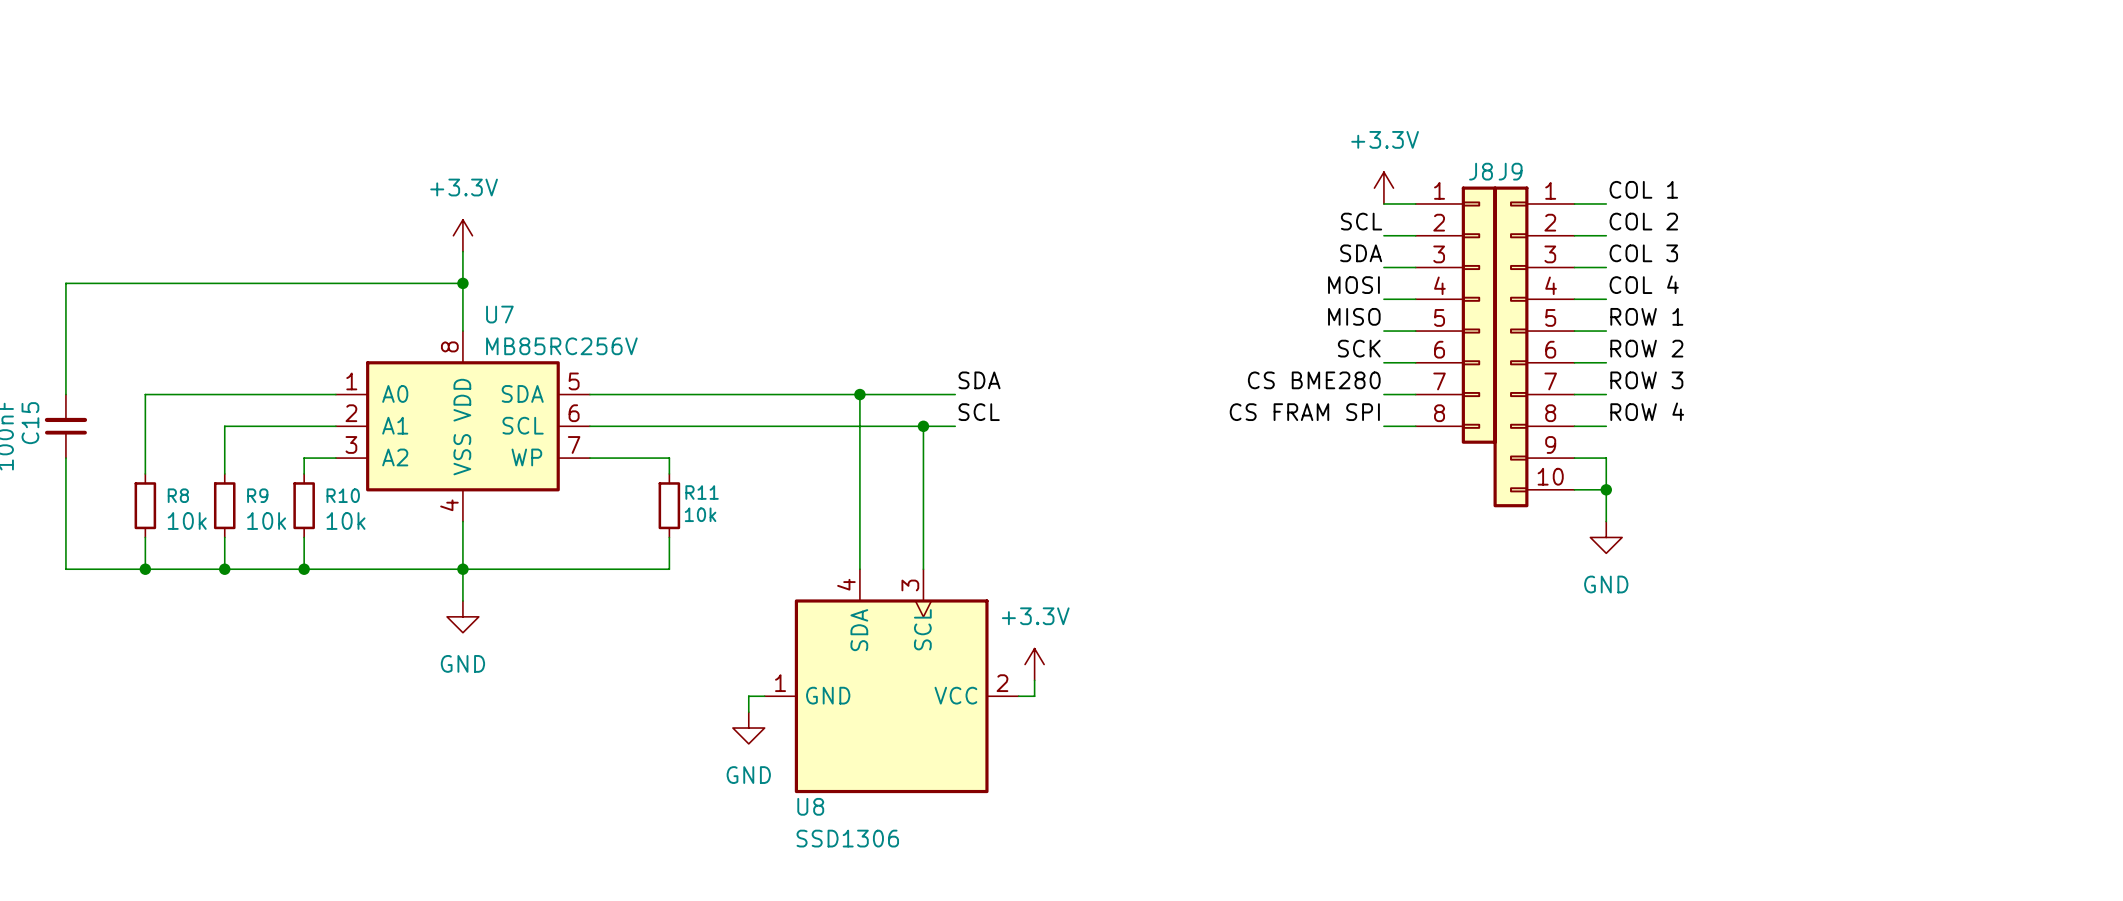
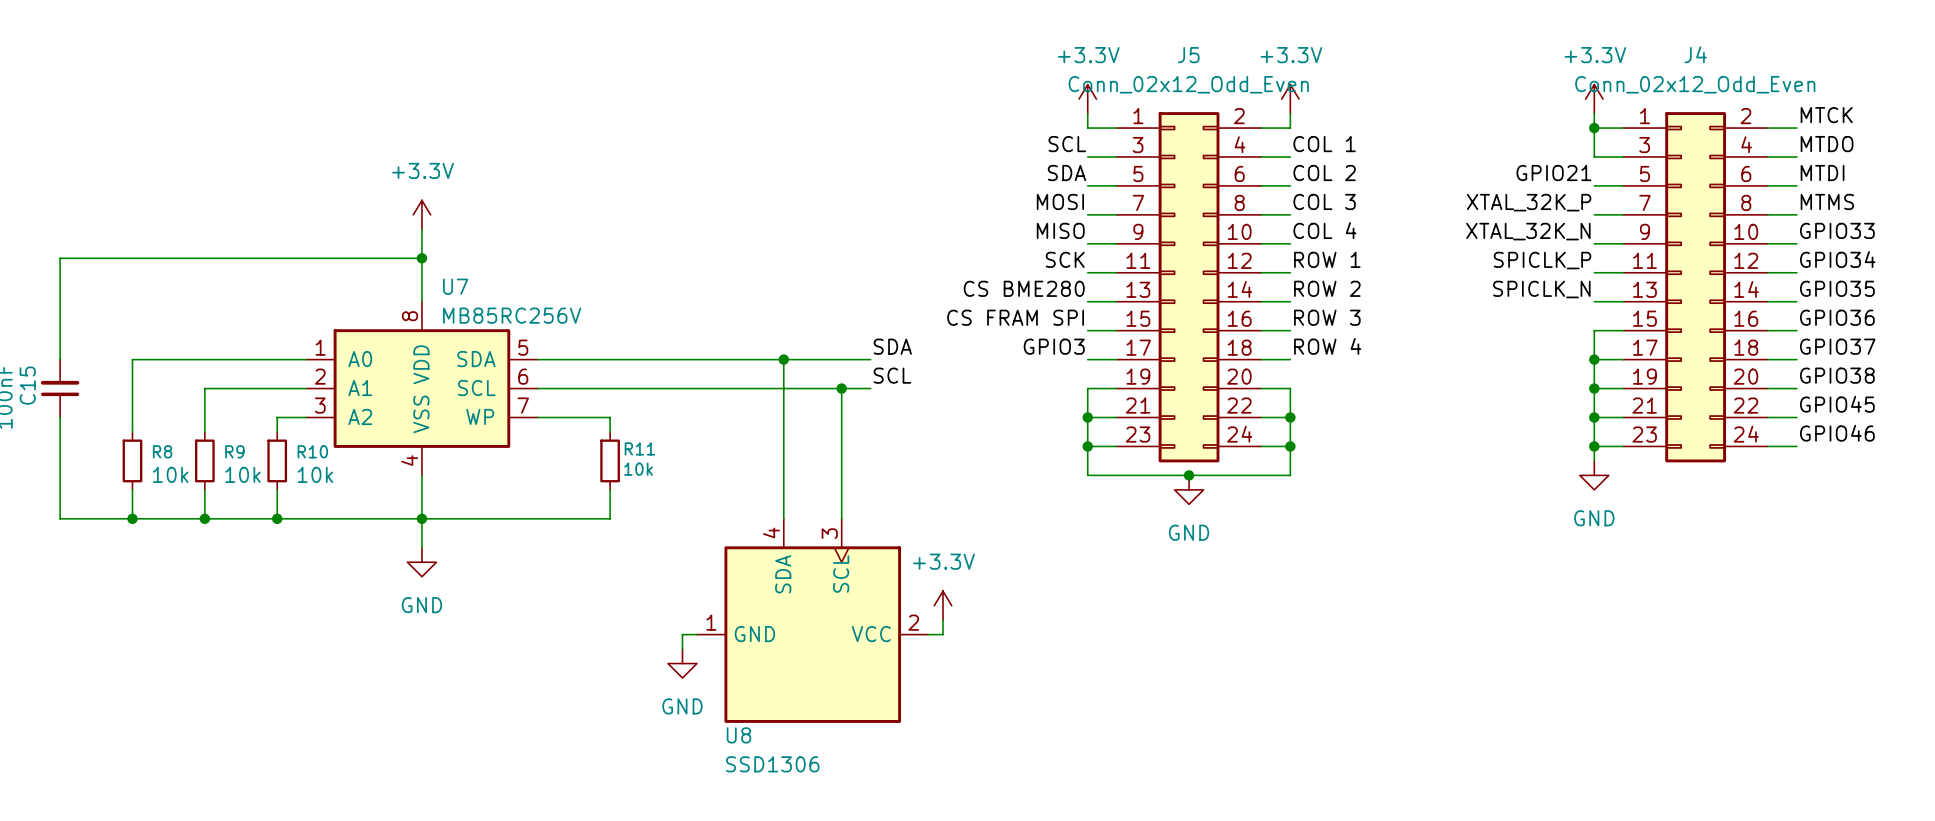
power symbol: none -> +3.3V (1087, 99)
power symbol: none -> +3.3V (1594, 99)
wire: none -> (1087, 113) (1087, 128) (1116, 128)
wire: none -> (1290, 113) (1290, 128) (1261, 128)
wire: none -> (1594, 113) (1594, 156) (1623, 156)
label: none -> MTCK (1826, 115)
wire: none -> (1594, 128) (1623, 128)
junction: none -> (1594, 128)
wire: none -> (1767, 128) (1796, 128)
label: none -> MTDO (1827, 144)
wire: none -> (1087, 156) (1116, 156)
wire: none -> (1261, 156) (1290, 156)
wire: none -> (1767, 156) (1796, 156)
power symbol position: +3.3V (1383, 188) -> +3.3V (1290, 99)
label position: COL 1 (1643, 189) -> COL 1 (1324, 144)
label: none -> GPIO21 (1553, 173)
label: none -> MTDI (1822, 173)
wire: none -> (1087, 185) (1116, 185)
wire: (1574, 203) (1606, 203) -> (1594, 185) (1623, 185)
wire: none -> (1767, 185) (1796, 185)
label position: SCL (1361, 221) -> SCL (1067, 144)
label position: COL 2 (1643, 221) -> COL 2 (1324, 173)
label: none -> MTMS (1827, 201)
label: none -> XTAL_32K_P (1529, 202)
wire: none -> (1087, 214) (1116, 214)
wire: (1574, 235) (1606, 235) -> (1594, 214) (1623, 214)
wire: none -> (1767, 214) (1796, 214)
label position: SDA (1361, 253) -> SDA (1066, 173)
label position: COL 3 (1643, 253) -> COL 3 (1324, 201)
label: none -> GPIO33 (1837, 230)
label: none -> XTAL_32K_N (1528, 231)
wire: none -> (1087, 243) (1116, 243)
wire: (1574, 267) (1606, 267) -> (1594, 243) (1623, 243)
wire: none -> (1767, 243) (1796, 243)
label position: COL 4 (1644, 284) -> COL 4 (1324, 230)
label: none -> GPIO34 (1837, 259)
label position: MOSI (1353, 285) -> MOSI (1060, 201)
label: none -> SPICLK_P (1542, 260)
wire: none -> (1087, 272) (1116, 272)
wire: (1574, 299) (1606, 299) -> (1594, 272) (1623, 272)
wire: none -> (1767, 272) (1796, 272)
J5: none -> Conn_02x12_Odd_Even (1189, 287)
J8: (1456, 315) -> none
J4: none -> Conn_02x12_Odd_Even (1695, 287)
label position: MISO (1354, 316) -> MISO (1060, 230)
label position: ROW 1 (1646, 316) -> ROW 1 (1327, 259)
label: none -> GPIO35 (1837, 288)
label: none -> SPICLK_N (1541, 289)
wire: none -> (1087, 301) (1116, 301)
wire: (1574, 331) (1606, 331) -> (1594, 301) (1623, 301)
wire: none -> (1767, 301) (1796, 301)
J9: (1534, 346) -> none
label position: SCK (1359, 348) -> SCK (1065, 259)
label position: ROW 2 (1646, 348) -> ROW 2 (1327, 288)
label: none -> GPIO36 (1837, 317)
wire: none -> (1087, 330) (1116, 330)
wire: (1574, 362) (1606, 362) -> (1594, 417) (1623, 417)
wire: none -> (1623, 330) (1594, 330) (1594, 460)
wire: none -> (1767, 330) (1796, 330)
label: none -> GPIO3 (1054, 346)
label position: CS BME280 (1314, 380) -> CS BME280 (1024, 288)
label position: ROW 3 (1646, 380) -> ROW 3 (1327, 317)
label: none -> GPIO37 (1837, 346)
wire: none -> (1087, 359) (1116, 359)
wire: (1574, 394) (1606, 394) -> (1594, 359) (1623, 359)
junction: none -> (1594, 359)
wire: none -> (1767, 359) (1796, 359)
label position: ROW 4 (1647, 411) -> ROW 4 (1327, 346)
label position: CS FRAM SPI (1304, 412) -> CS FRAM SPI (1015, 317)
label: none -> GPIO38 (1837, 375)
wire: none -> (1116, 388) (1087, 388) (1087, 475) (1290, 475) (1290, 388)
wire: (1574, 426) (1606, 426) -> (1594, 388) (1623, 388)
junction: none -> (1594, 388)
wire: none -> (1767, 388) (1796, 388)
label: none -> GPIO45 (1837, 404)
wire: none -> (1087, 417) (1116, 417)
junction: none -> (1087, 417)
wire: none -> (1261, 417) (1290, 417)
junction: none -> (1290, 417)
wire: (1574, 458) (1606, 458) (1606, 521) -> none
junction: none -> (1594, 417)
wire: none -> (1767, 417) (1796, 417)
label: none -> GPIO46 (1837, 433)
wire: none -> (1087, 446) (1116, 446)
junction: none -> (1087, 446)
wire: none -> (1261, 446) (1290, 446)
junction: none -> (1290, 446)
wire: (1574, 489) (1606, 489) -> (1594, 446) (1623, 446)
junction: (1606, 489) -> none
junction: none -> (1594, 446)
wire: none -> (1767, 446) (1796, 446)
junction: none -> (1189, 475)
power symbol: none -> GND (1189, 489)
power symbol position: GND (1606, 537) -> GND (1594, 475)

